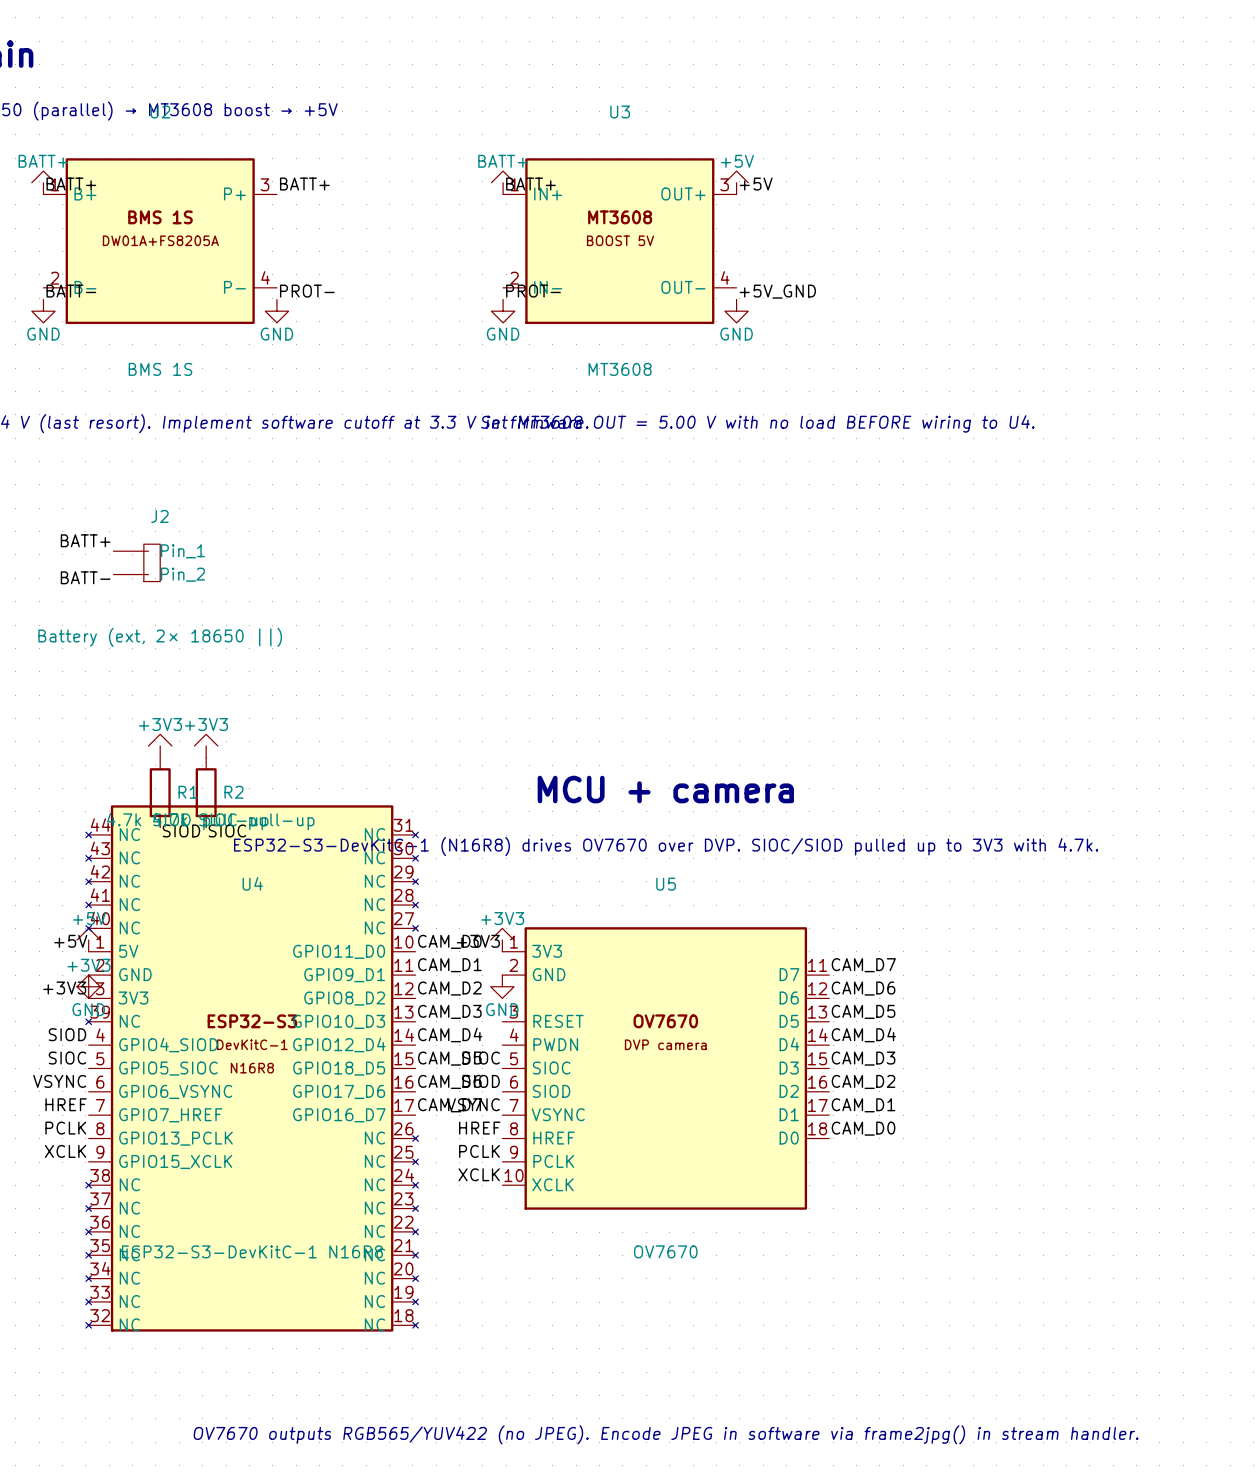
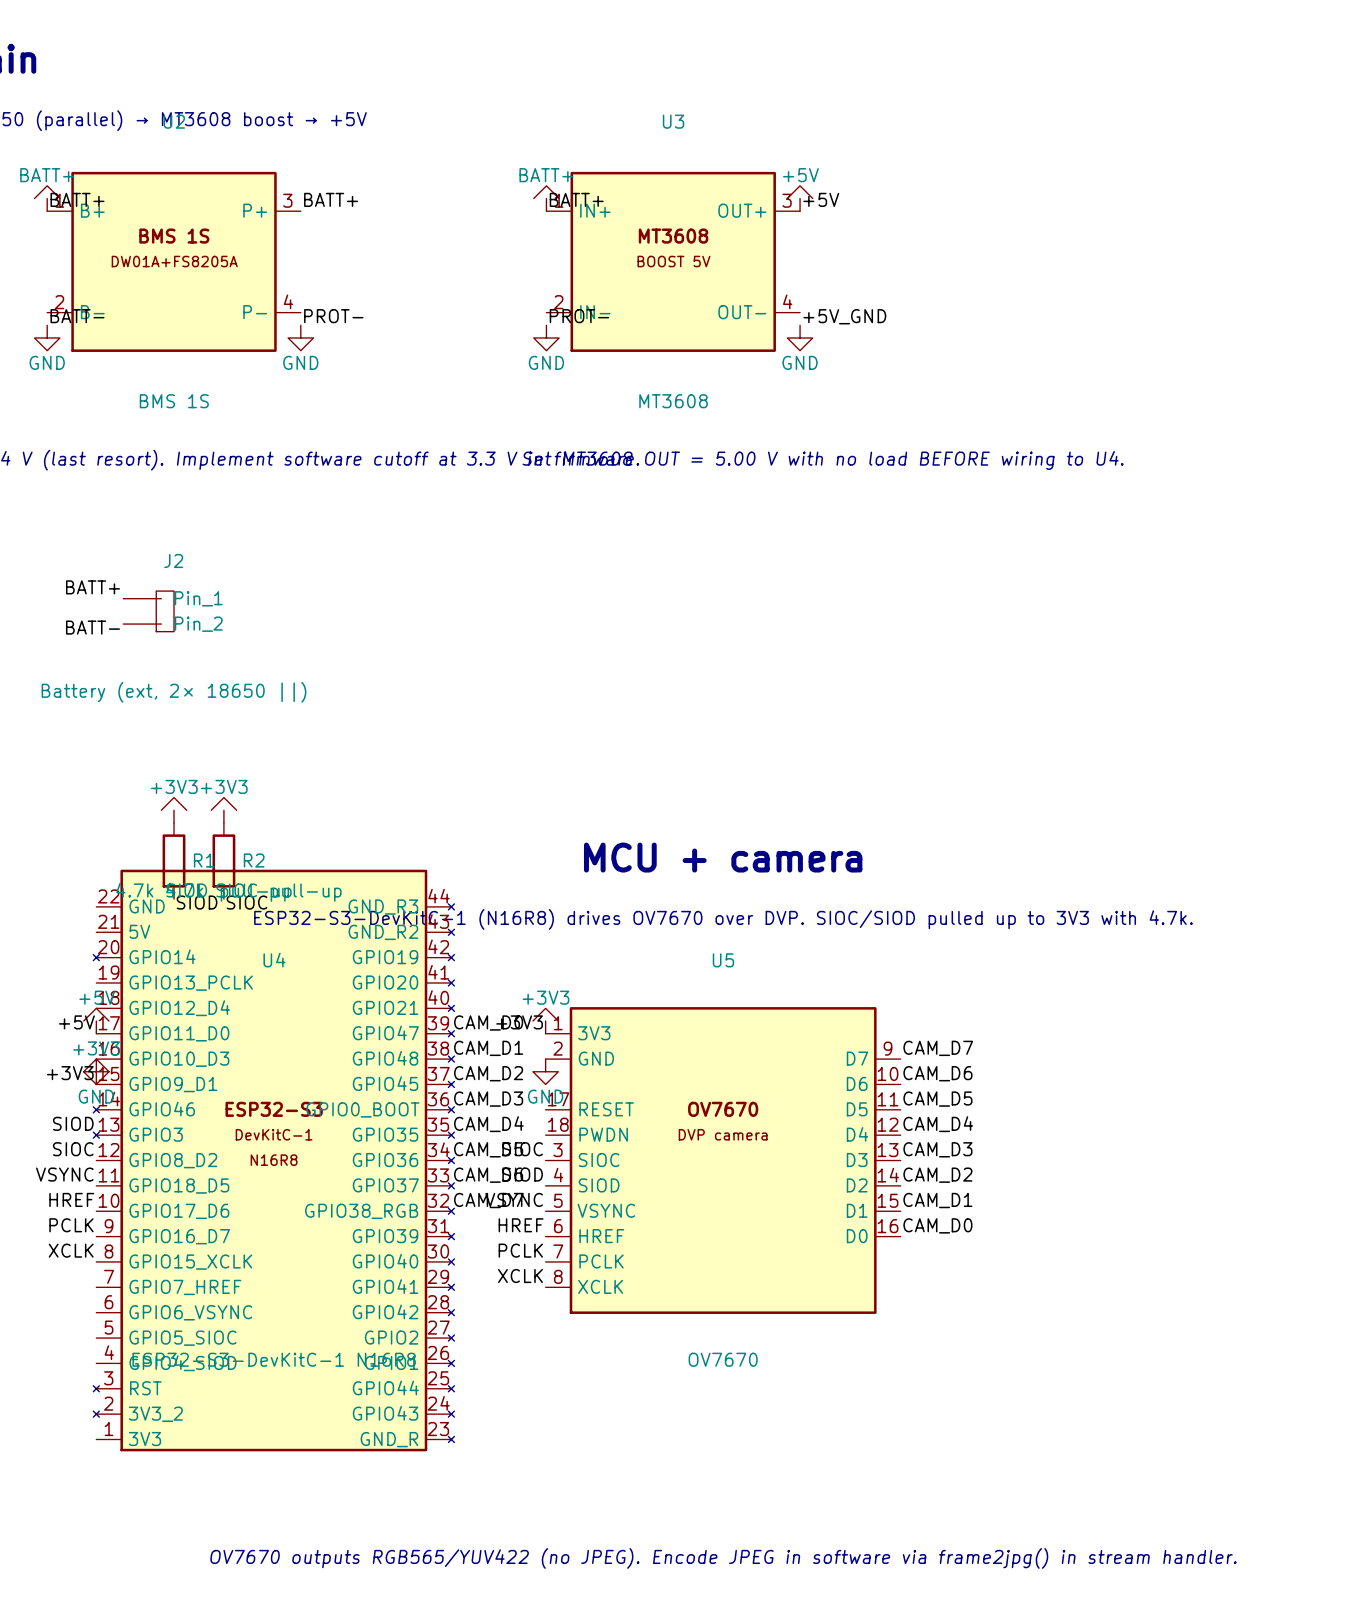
U4 symbol: [85, 805, 419, 1332] -> [93, 869, 455, 1452]
U5 symbol: [502, 927, 830, 1210] -> [545, 1007, 901, 1314]

